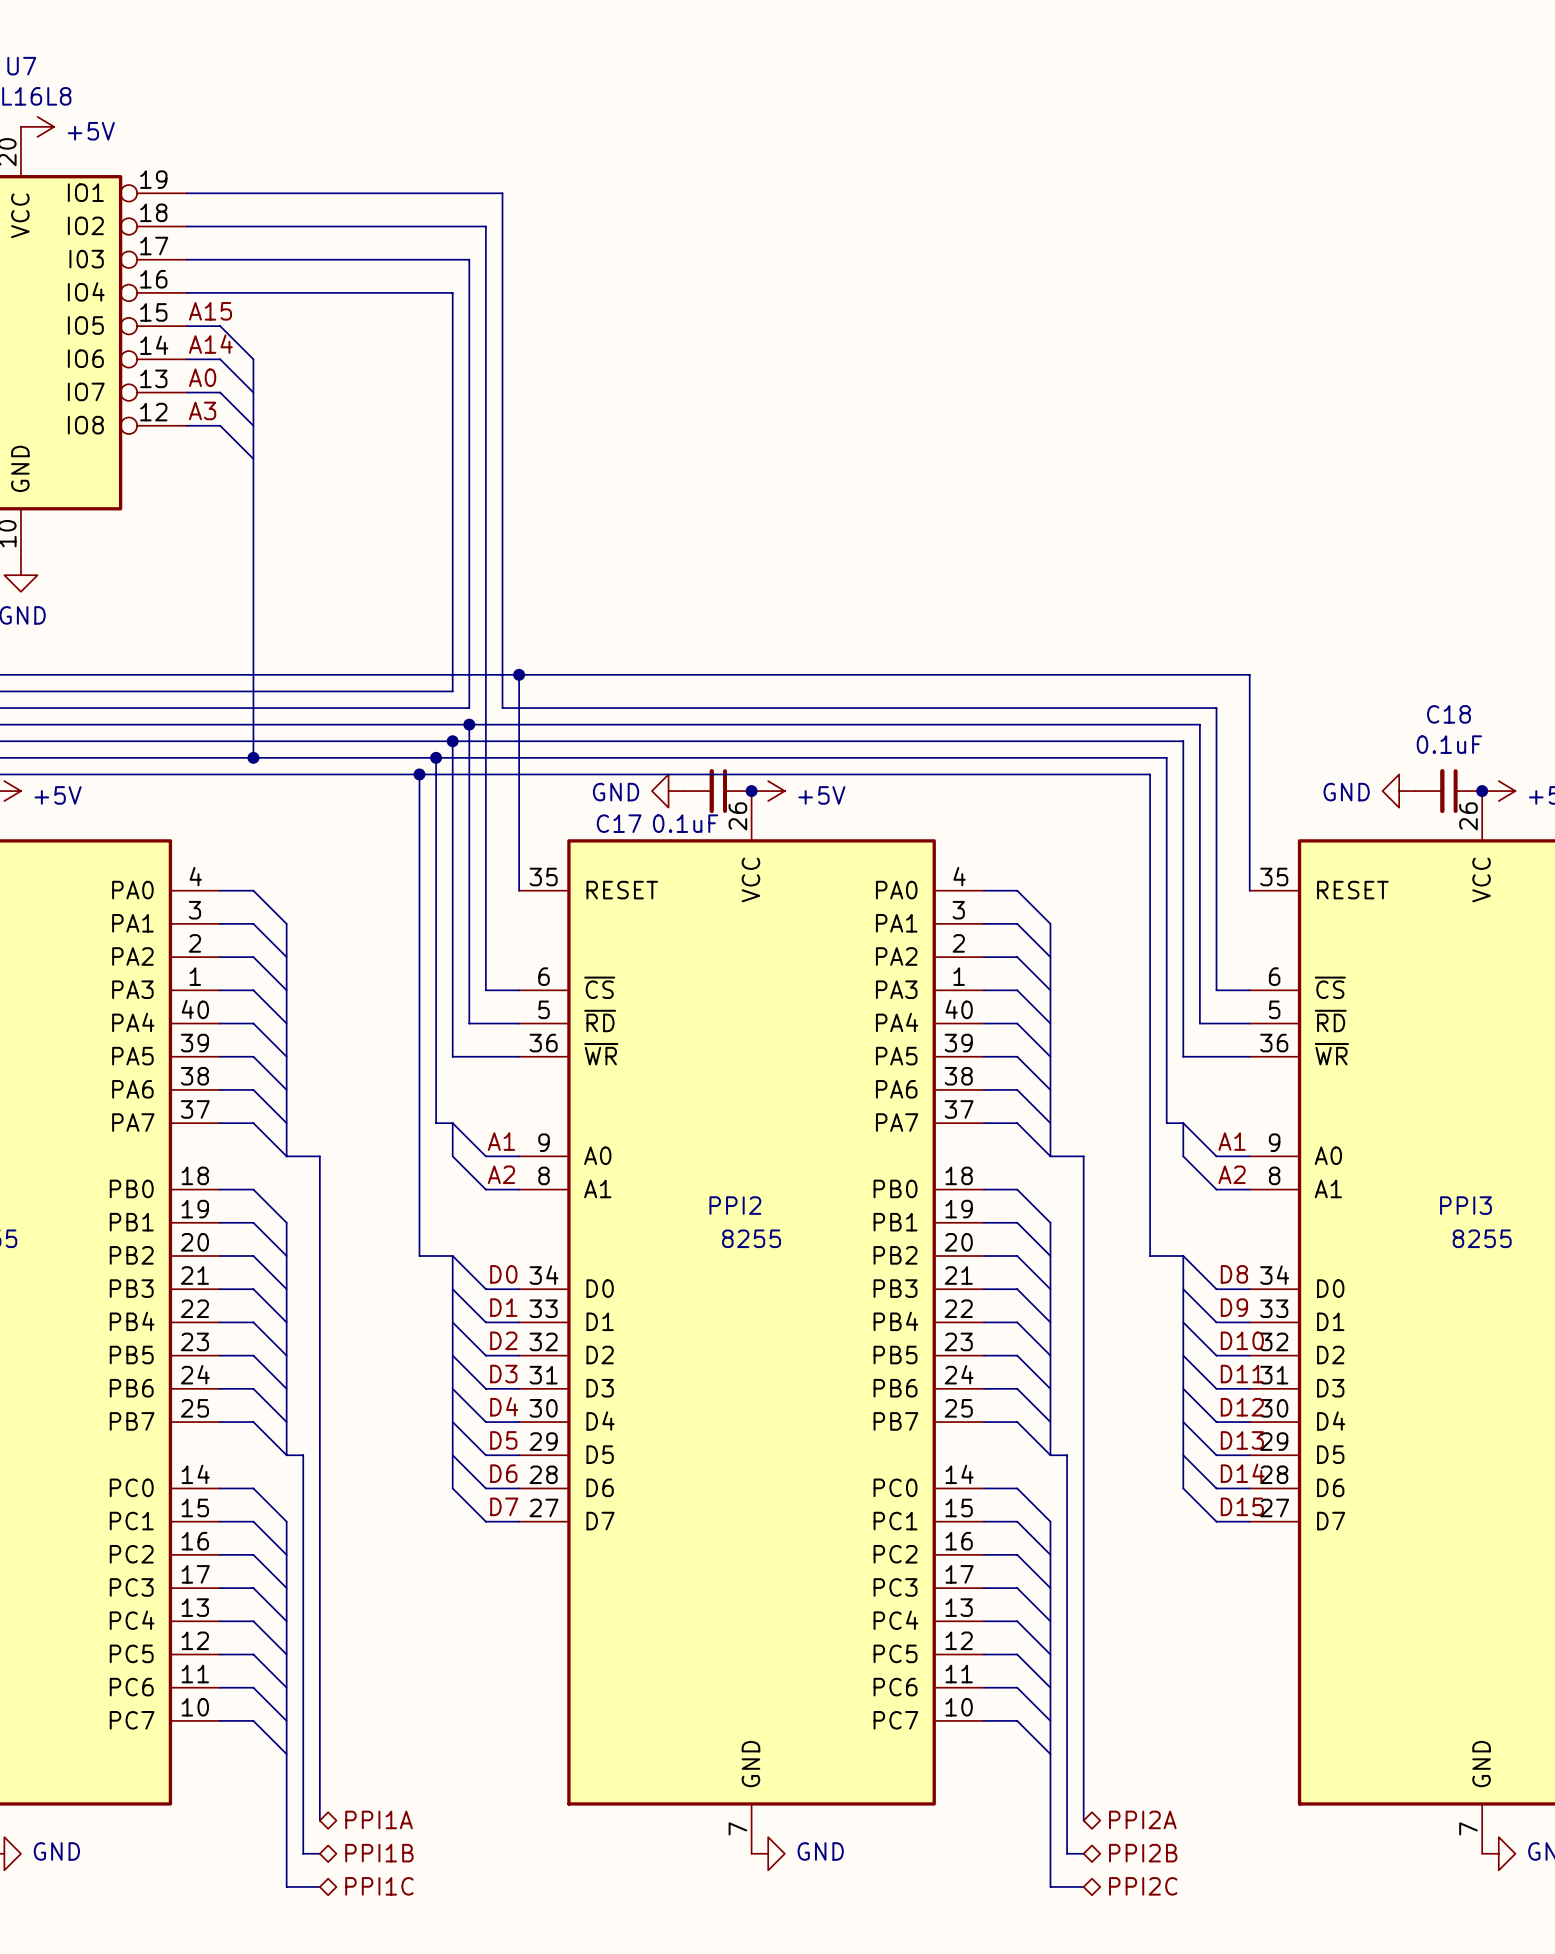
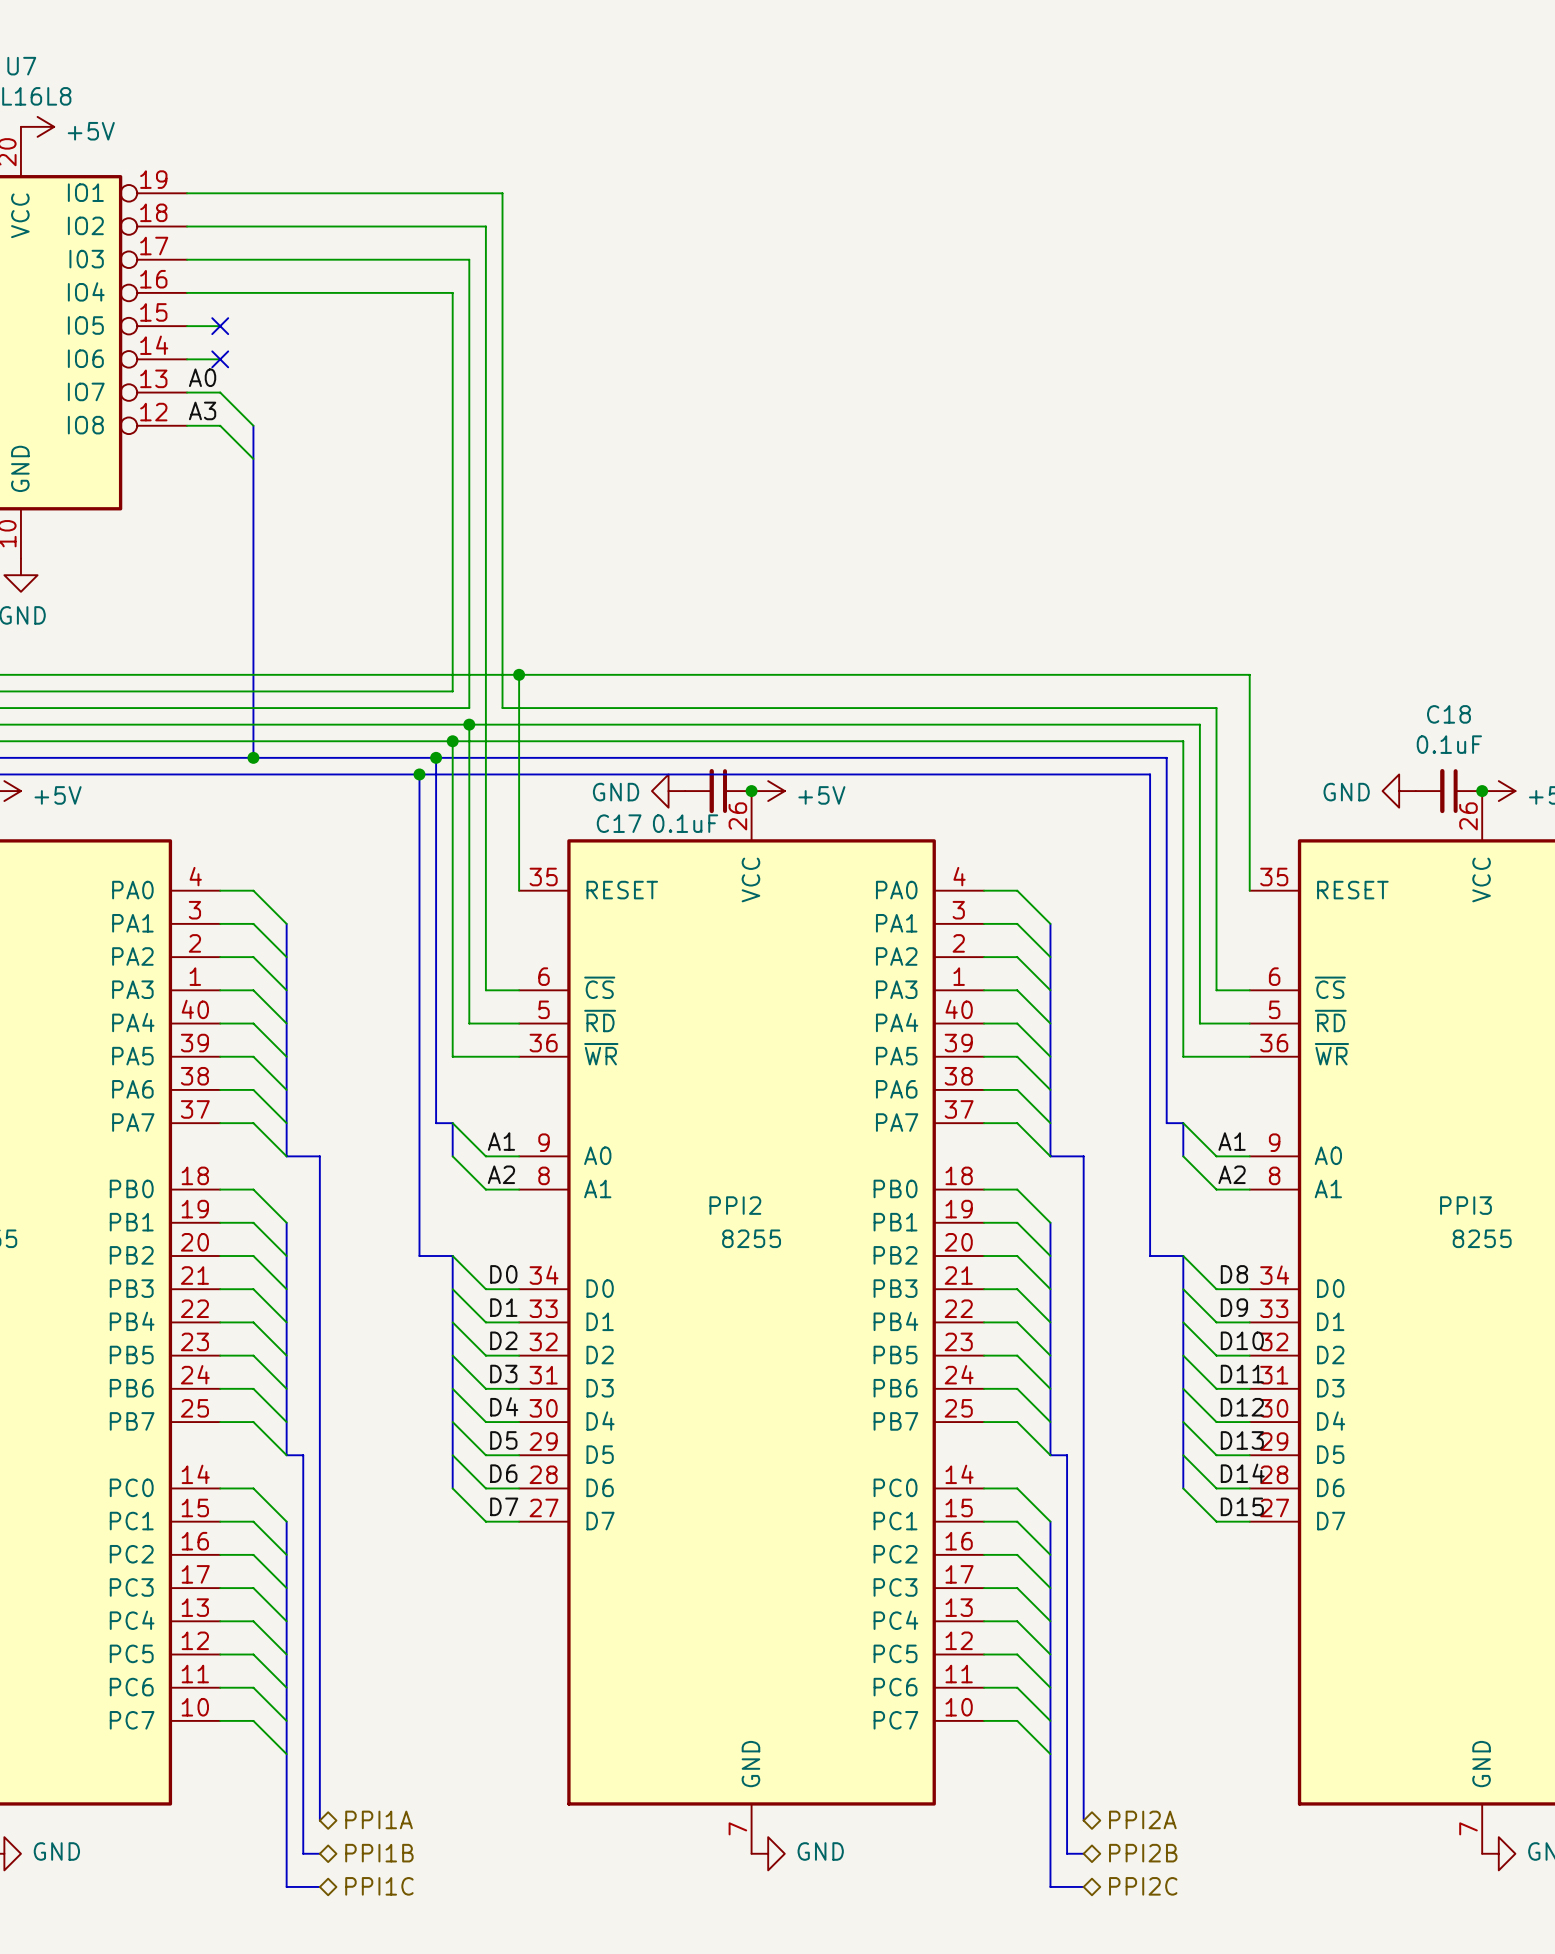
label: A15 (210, 311) -> none
wire: (220, 326) (253, 359) -> none
no-connect mark: none -> (220, 326)
label: A14 (210, 344) -> none
wire: (220, 359) (253, 392) -> none
no-connect mark: none -> (220, 359)
bus: (253, 359) (253, 425) -> none

